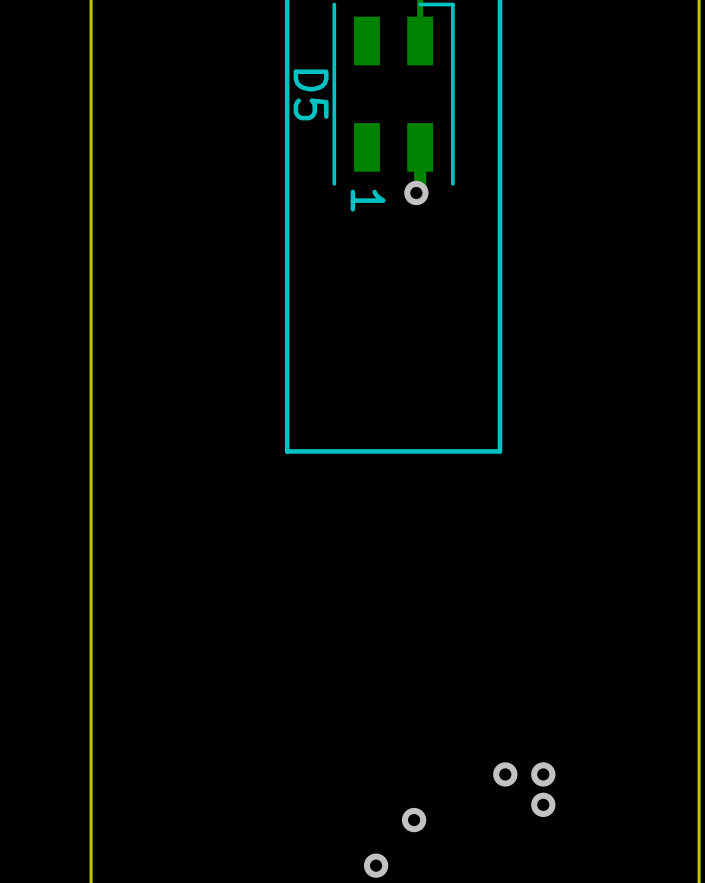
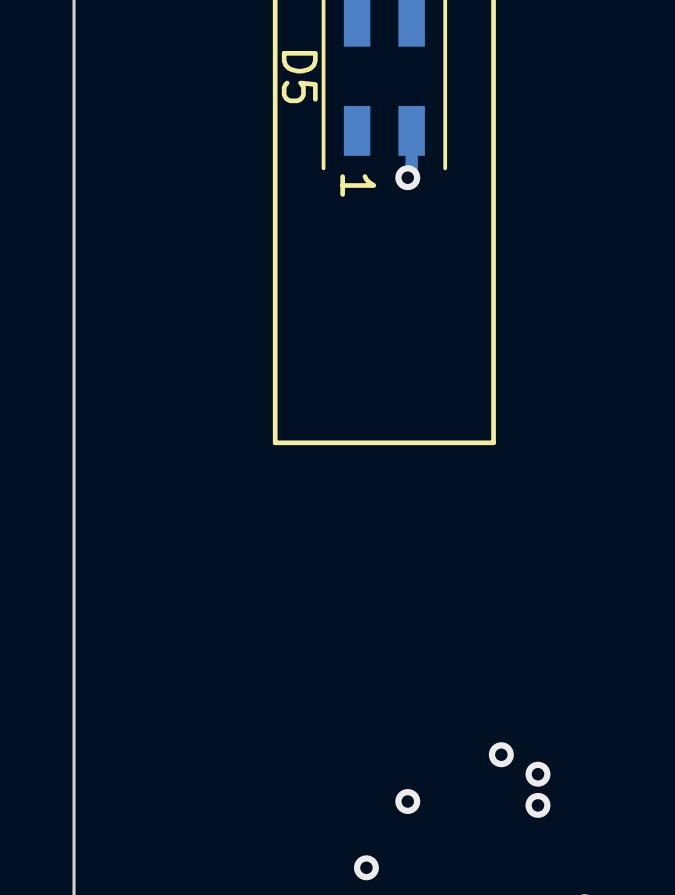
via position: (505, 774) -> (501, 754)
via position: (414, 820) -> (407, 801)

